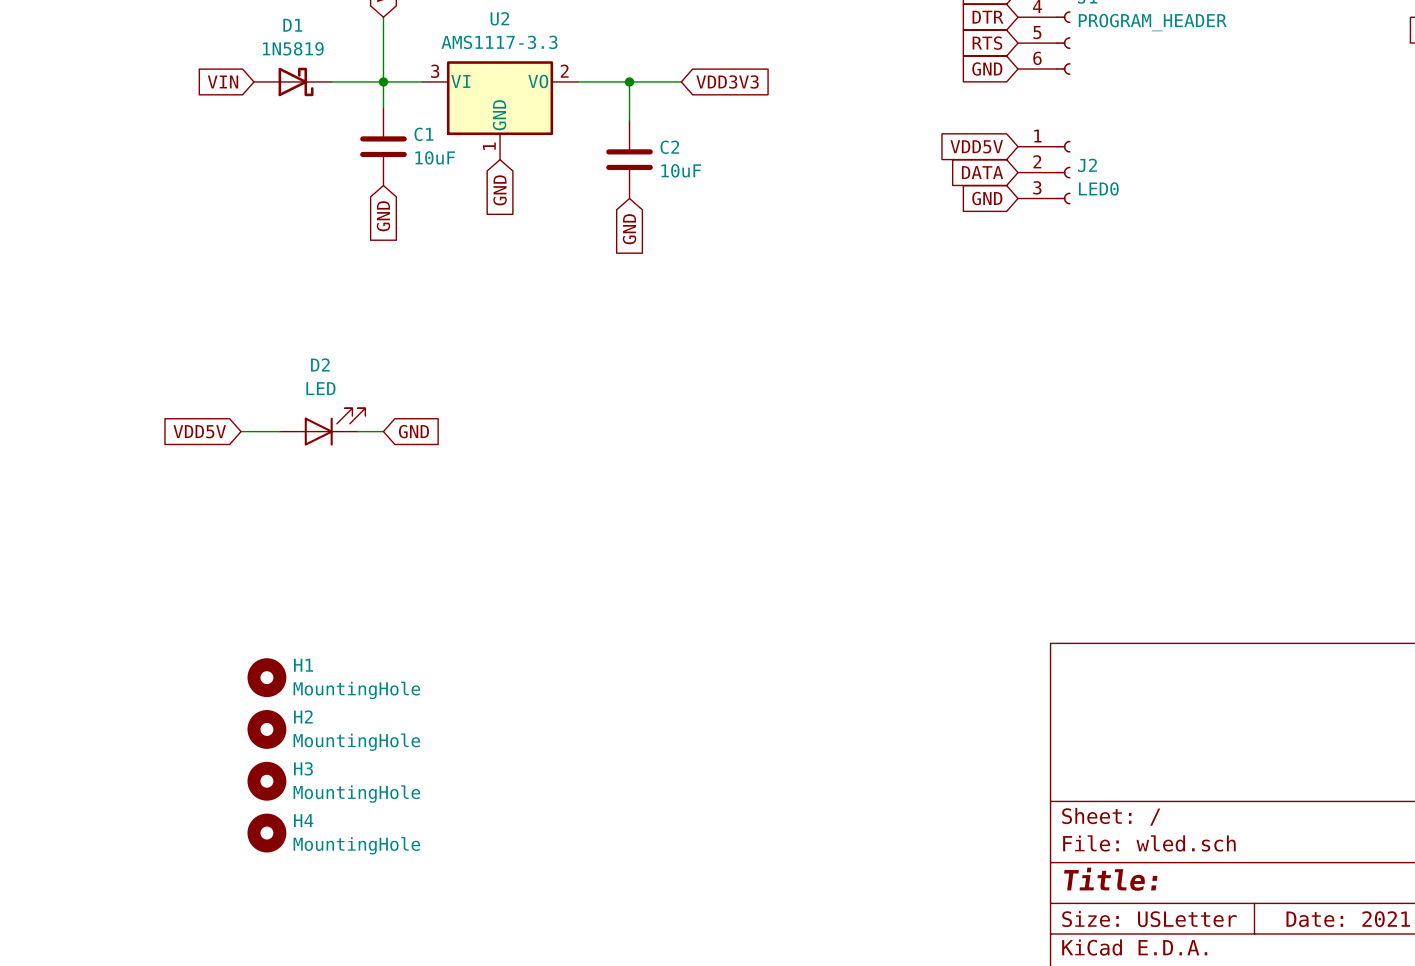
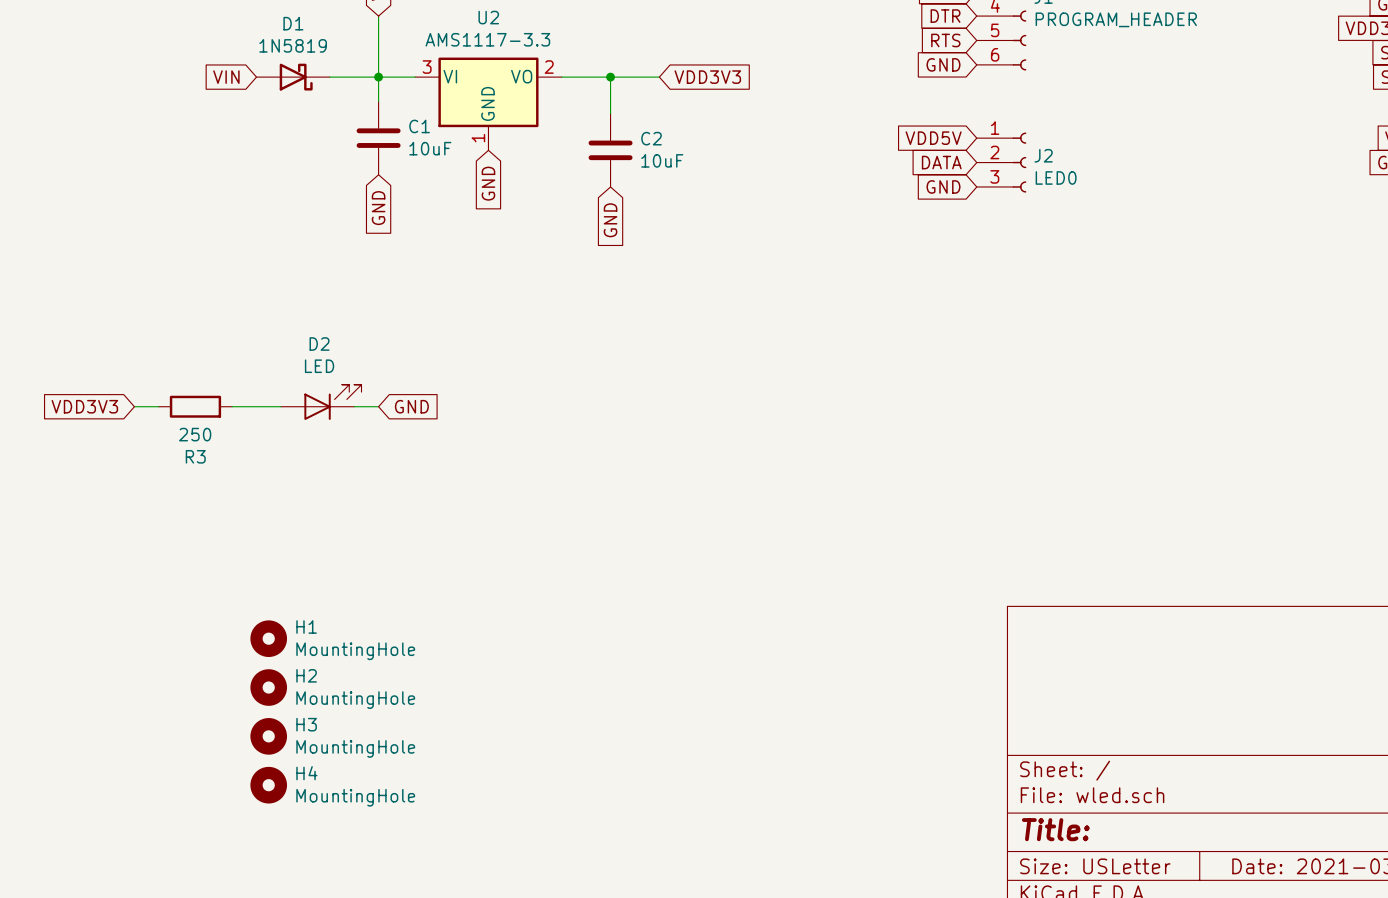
global label: none -> VDD3V3 (84, 406)
wire: none -> (134, 406) (158, 406)
R3: none -> 250 (195, 406)
global label: VDD5V (199, 431) -> none
wire: none -> (232, 406) (244, 406)

